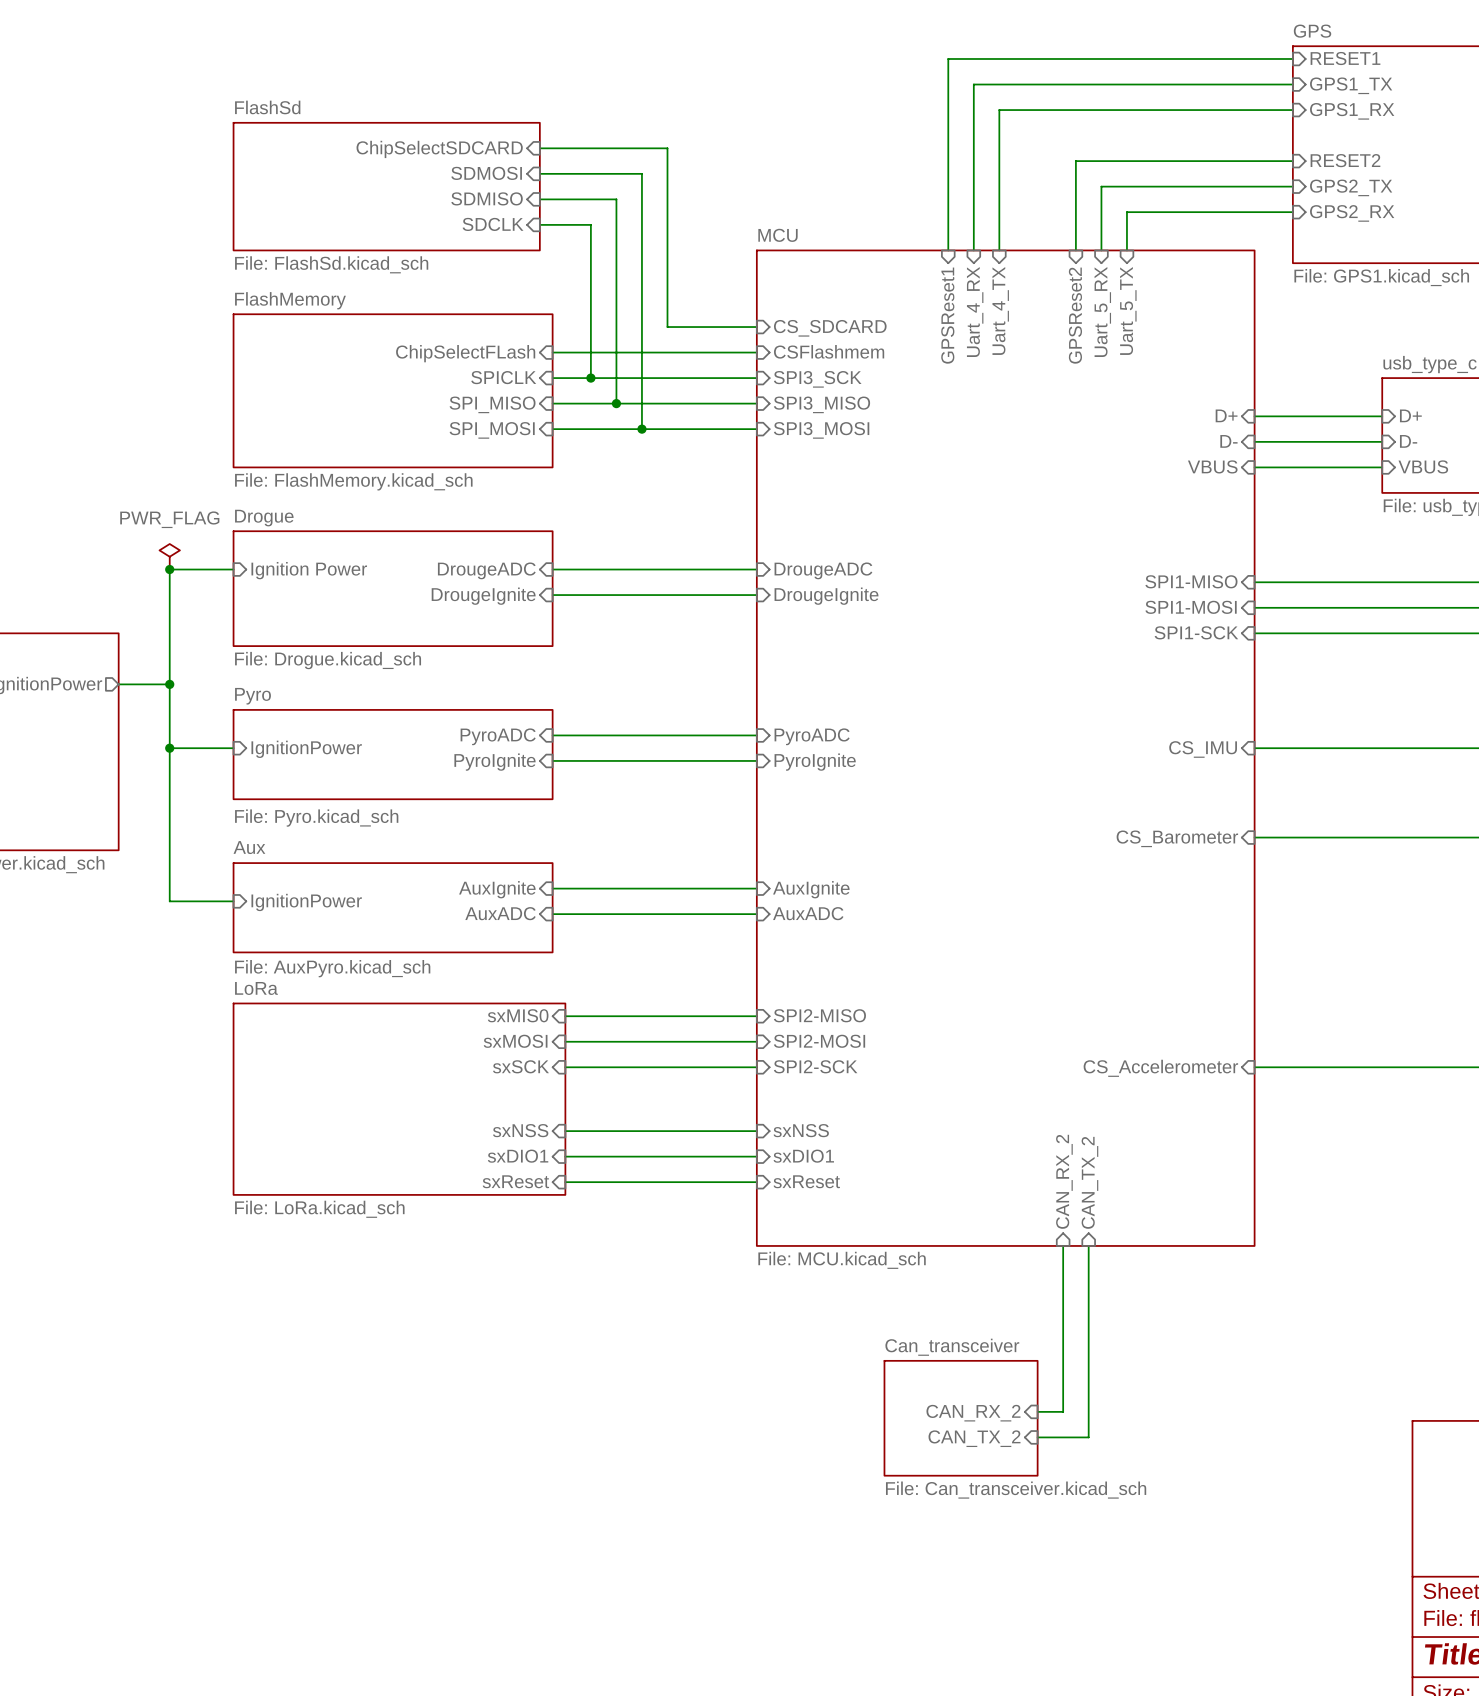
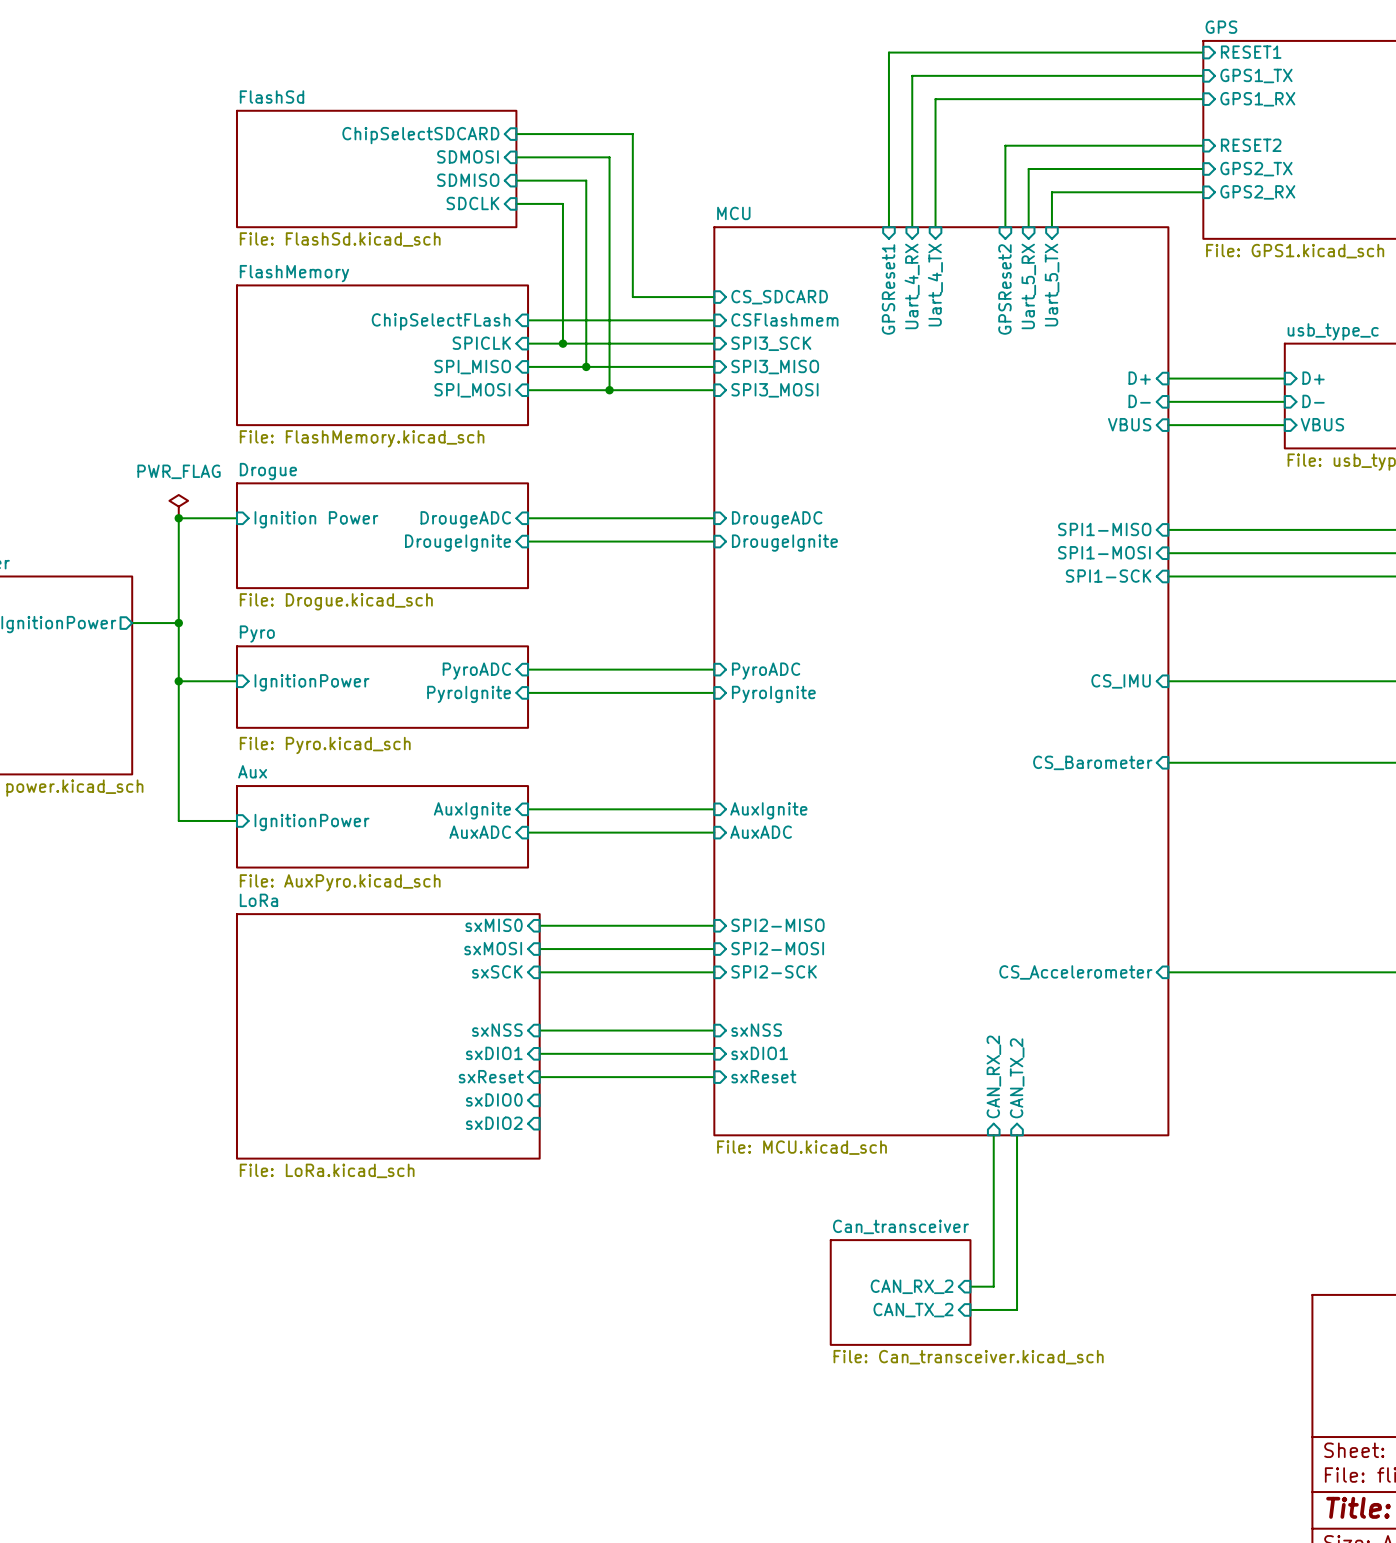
sheet LoRa: File: LoRa.kicad_sch (399, 1099) -> none
sheet LoRa: none -> File: LoRa.kicad_sch (388, 1036)
sheet pin: none -> sxDIO0 (494, 1099)
sheet pin: none -> sxDIO2 (494, 1123)

